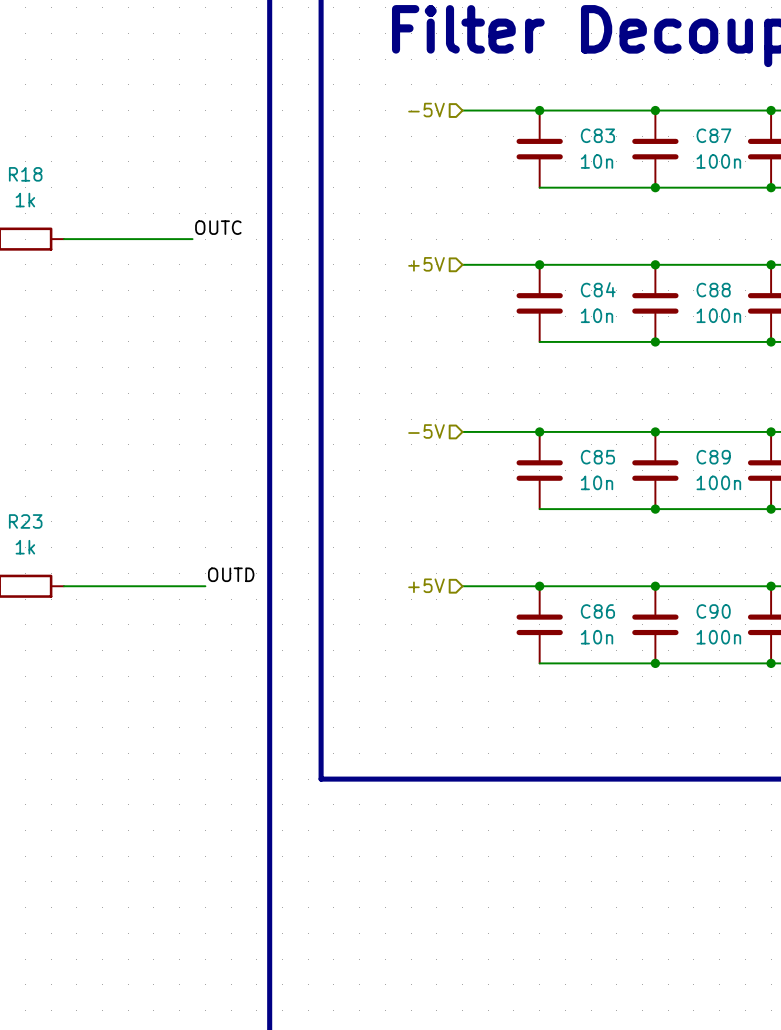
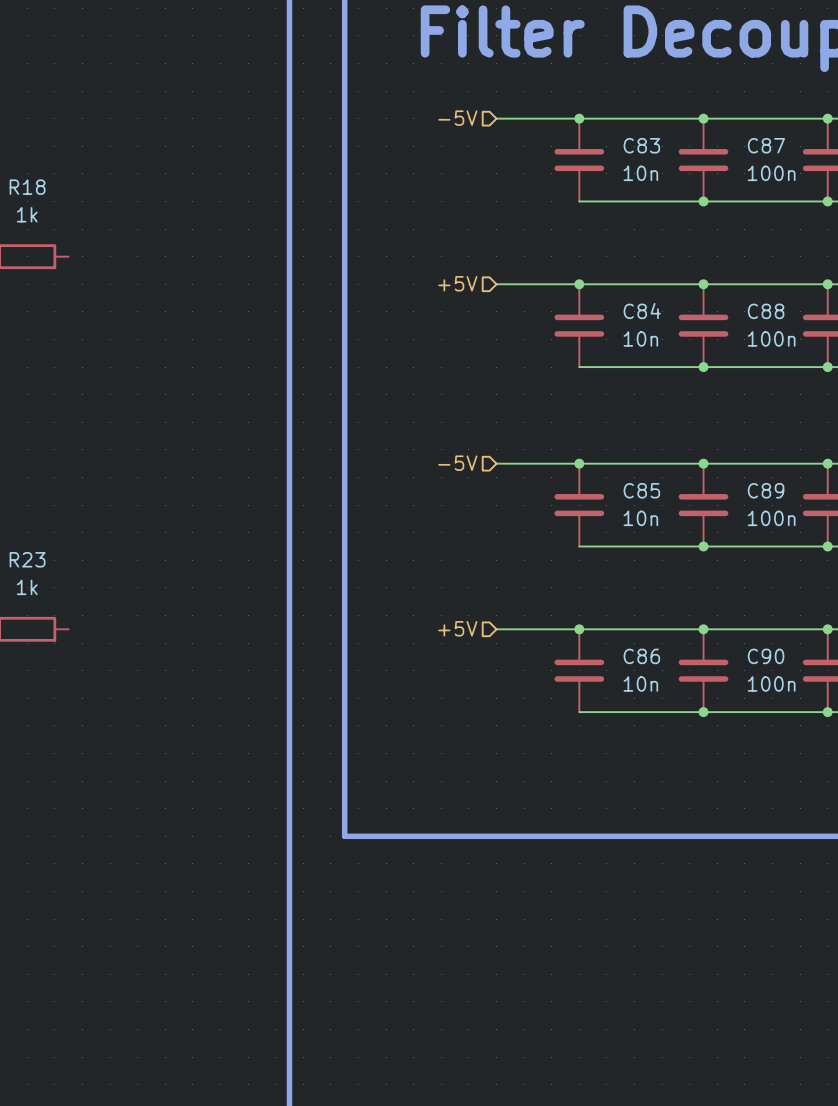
label: OUTC (218, 227) -> none
wire: (63, 239) (192, 239) -> none
label: OUTD (231, 574) -> none
wire: (63, 586) (205, 586) -> none

